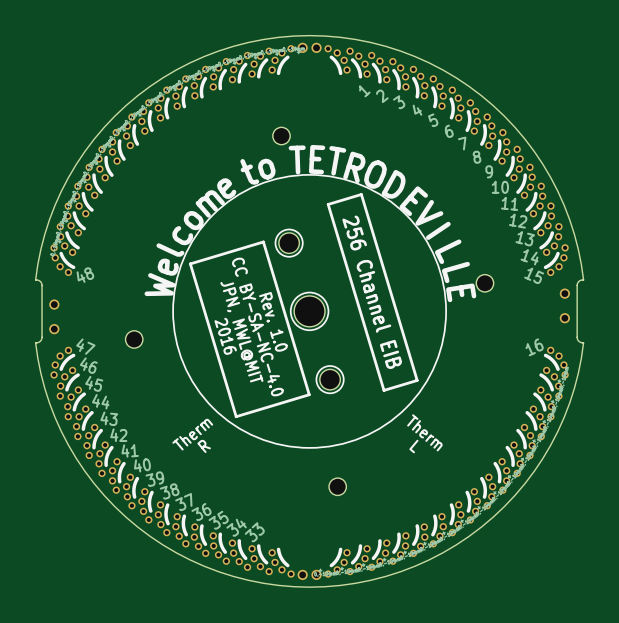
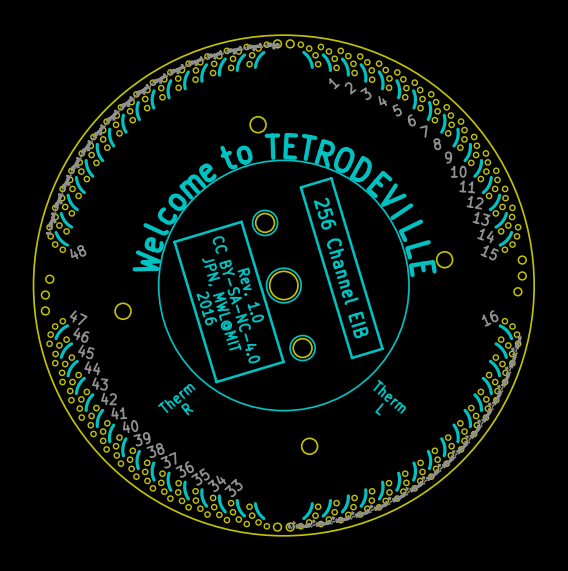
round board edge: none -> [33, 35, 535, 536]
board edge: (583, 279) (579, 281) (577, 284) (577, 338) (579, 341) (583, 342) (574, 388) (557, 431) (542, 458) (525, 483) (493, 517) (469, 536) (442, 552) (400, 571) (370, 580) (340, 585) (294, 586) (263, 583) (233, 576) (190, 559) (163, 545) (137, 527) (114, 506) (94, 483) (68, 445) (49, 402) (40, 373) (35, 342) (39, 341) (41, 338) (41, 284) (39, 281) (35, 279) (44, 234) (61, 191) (76, 164) (94, 139) (126, 105) (150, 86) (176, 69) (218, 51) (248, 42) (278, 37) (325, 36) (355, 39) (385, 46) (429, 62) (456, 77) (481, 95) (504, 116) (525, 139) (550, 177) (569, 219) (578, 249) (583, 279) -> none
part: none -> (522, 260)
part: (564, 293) -> none
part: none -> (522, 275)
part: none -> (45, 295)
part: (54, 329) -> none
part: none -> (45, 310)

